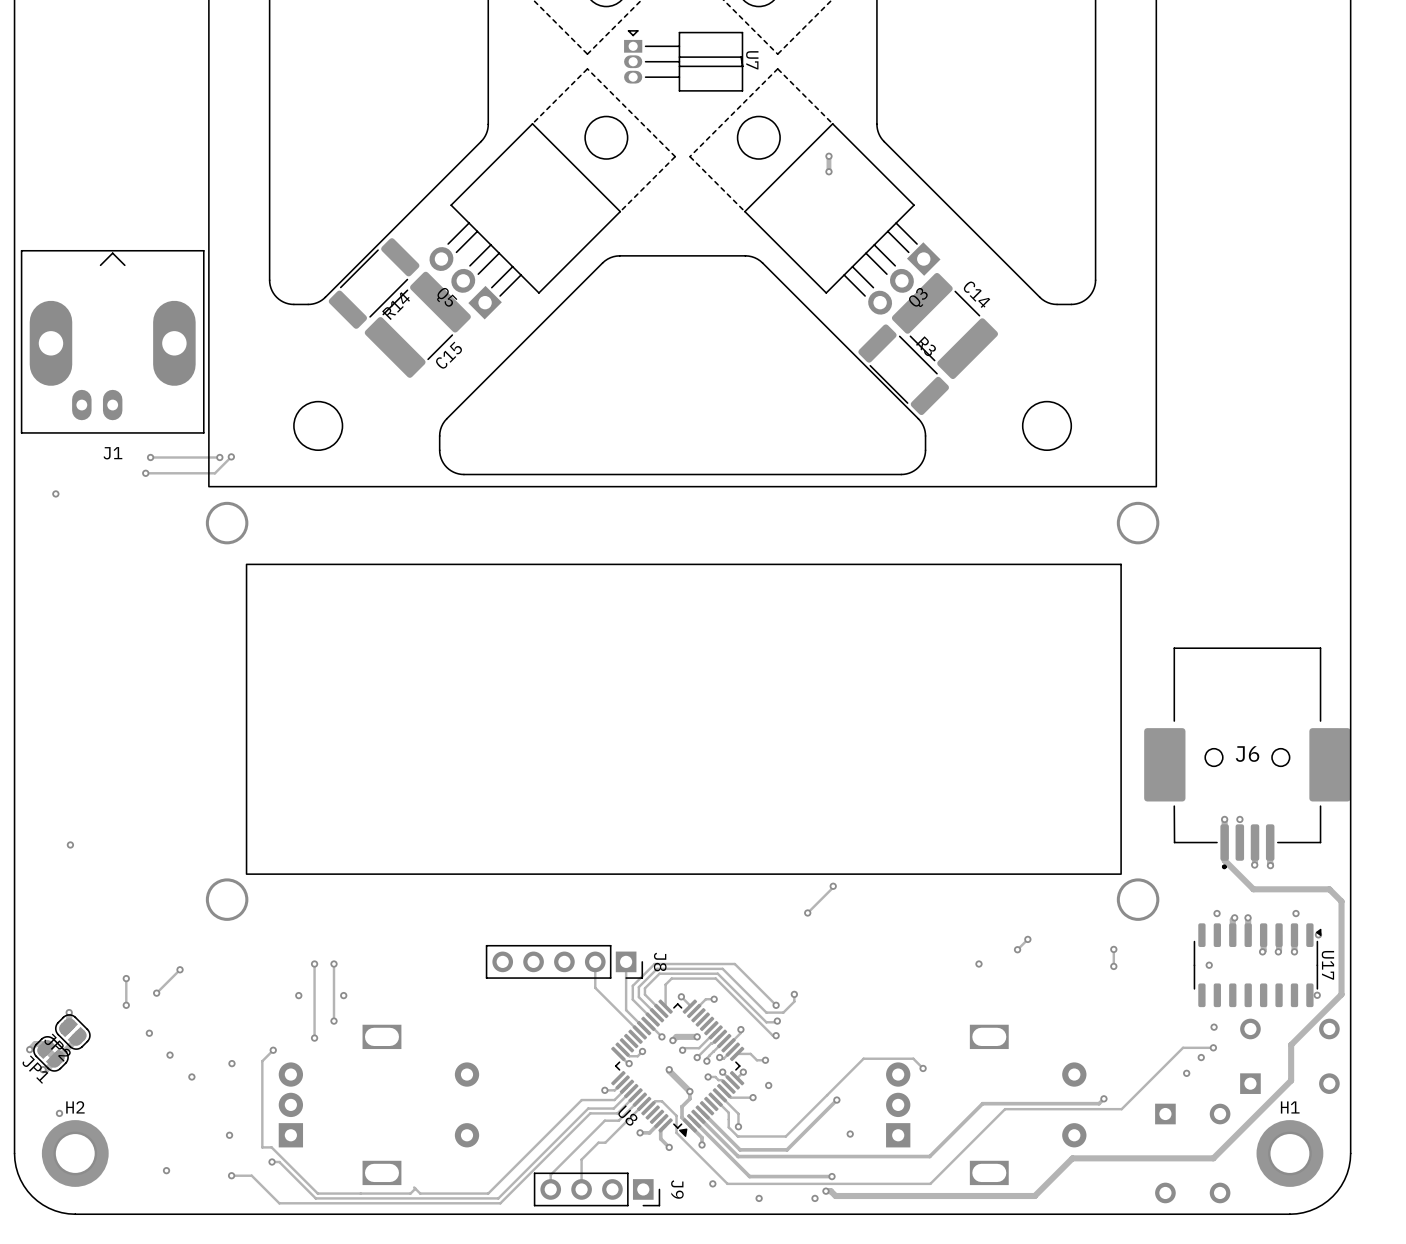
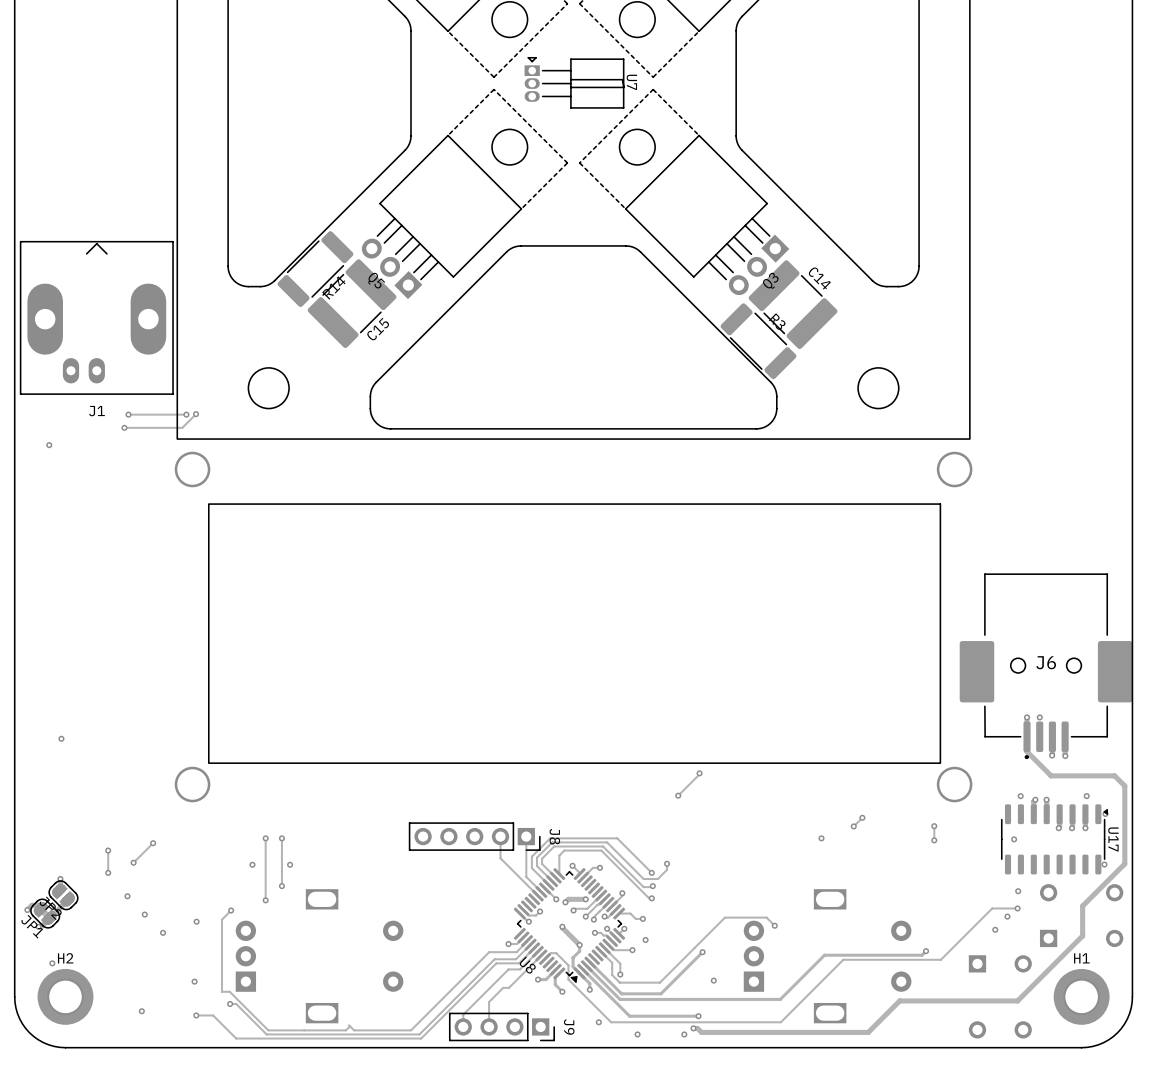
track: (828, 156) (828, 171) -> none
via: (828, 156) -> none
via: (828, 171) -> none

